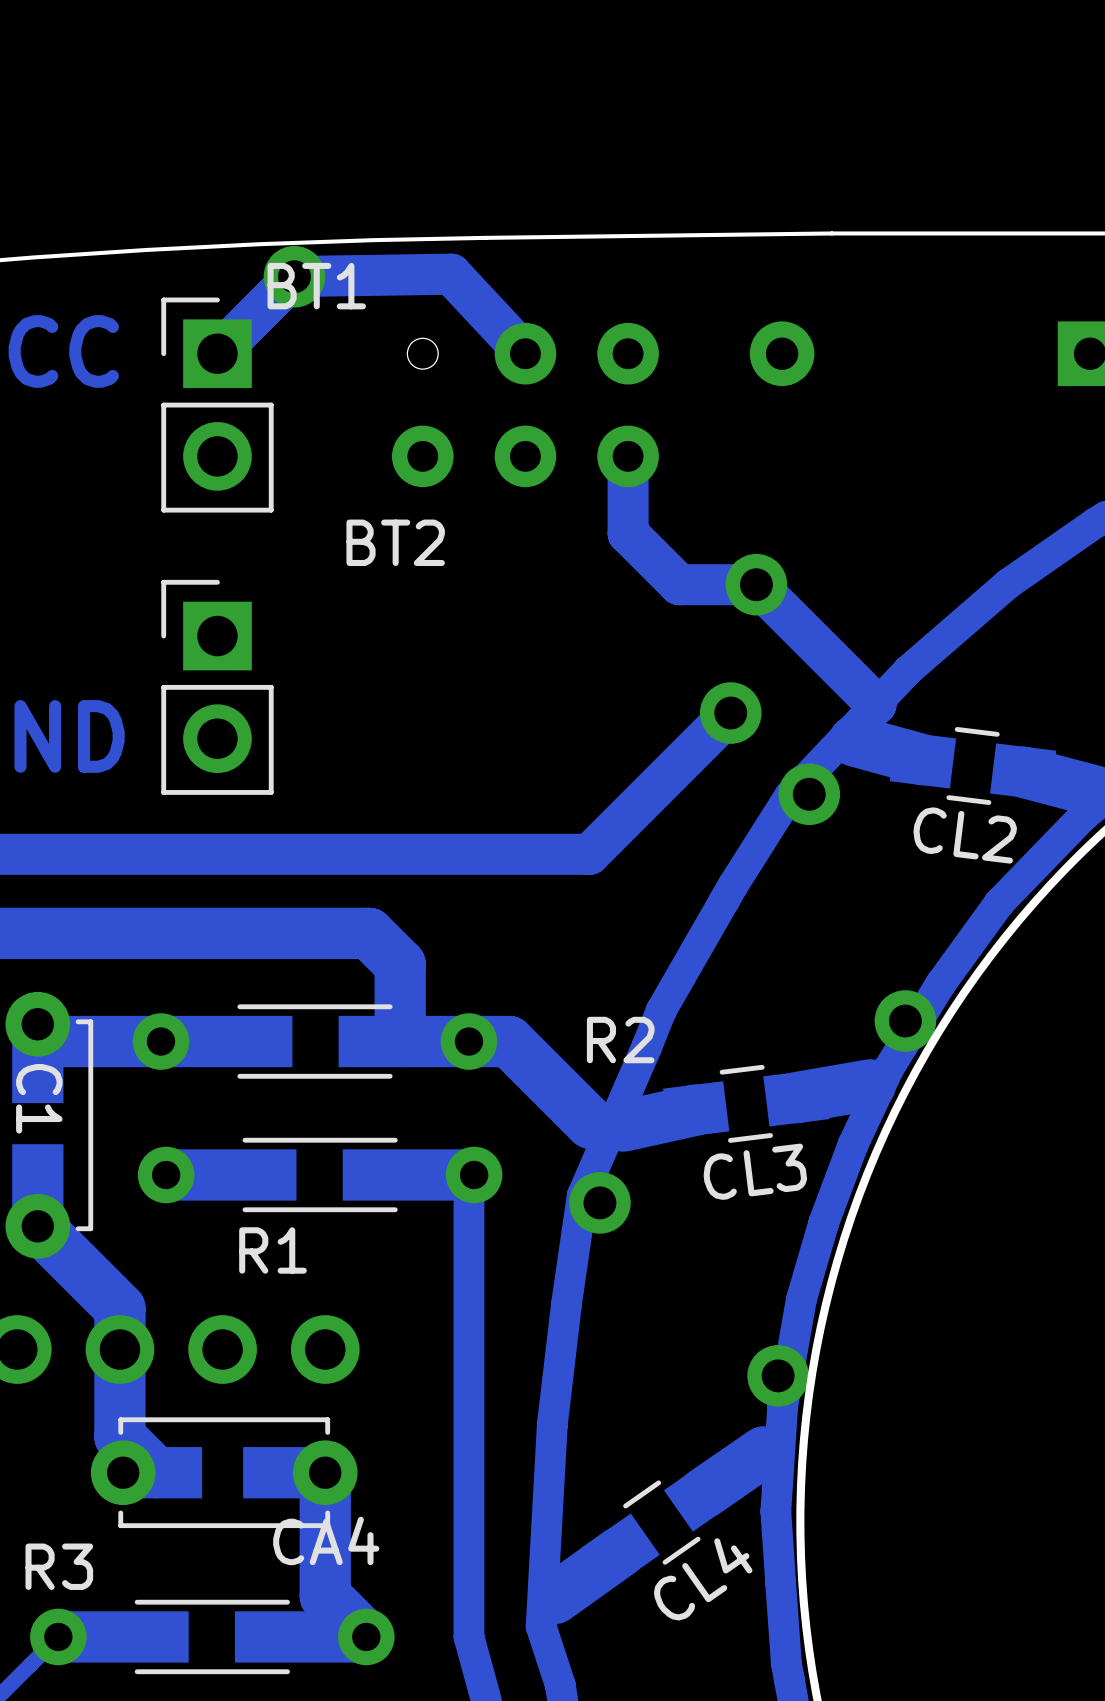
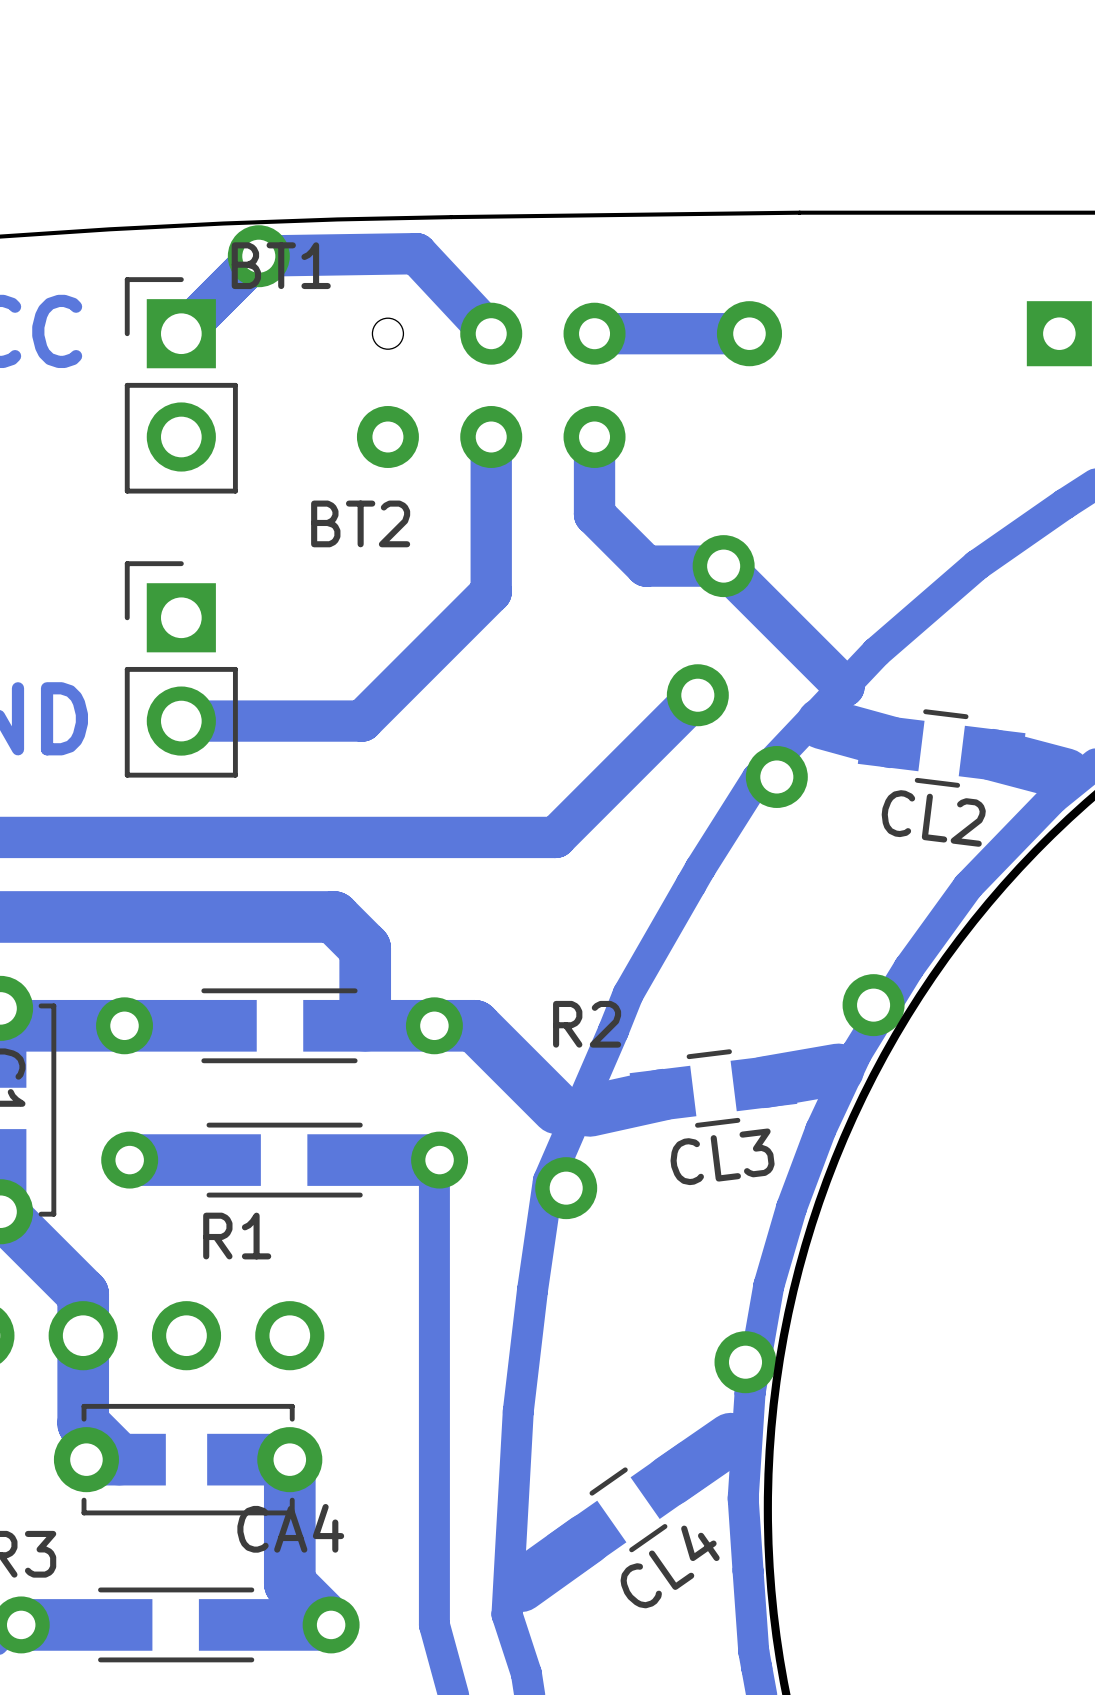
track: none -> (749, 333) (594, 333)
track: none -> (491, 436) (491, 591) (362, 721) (181, 721)

